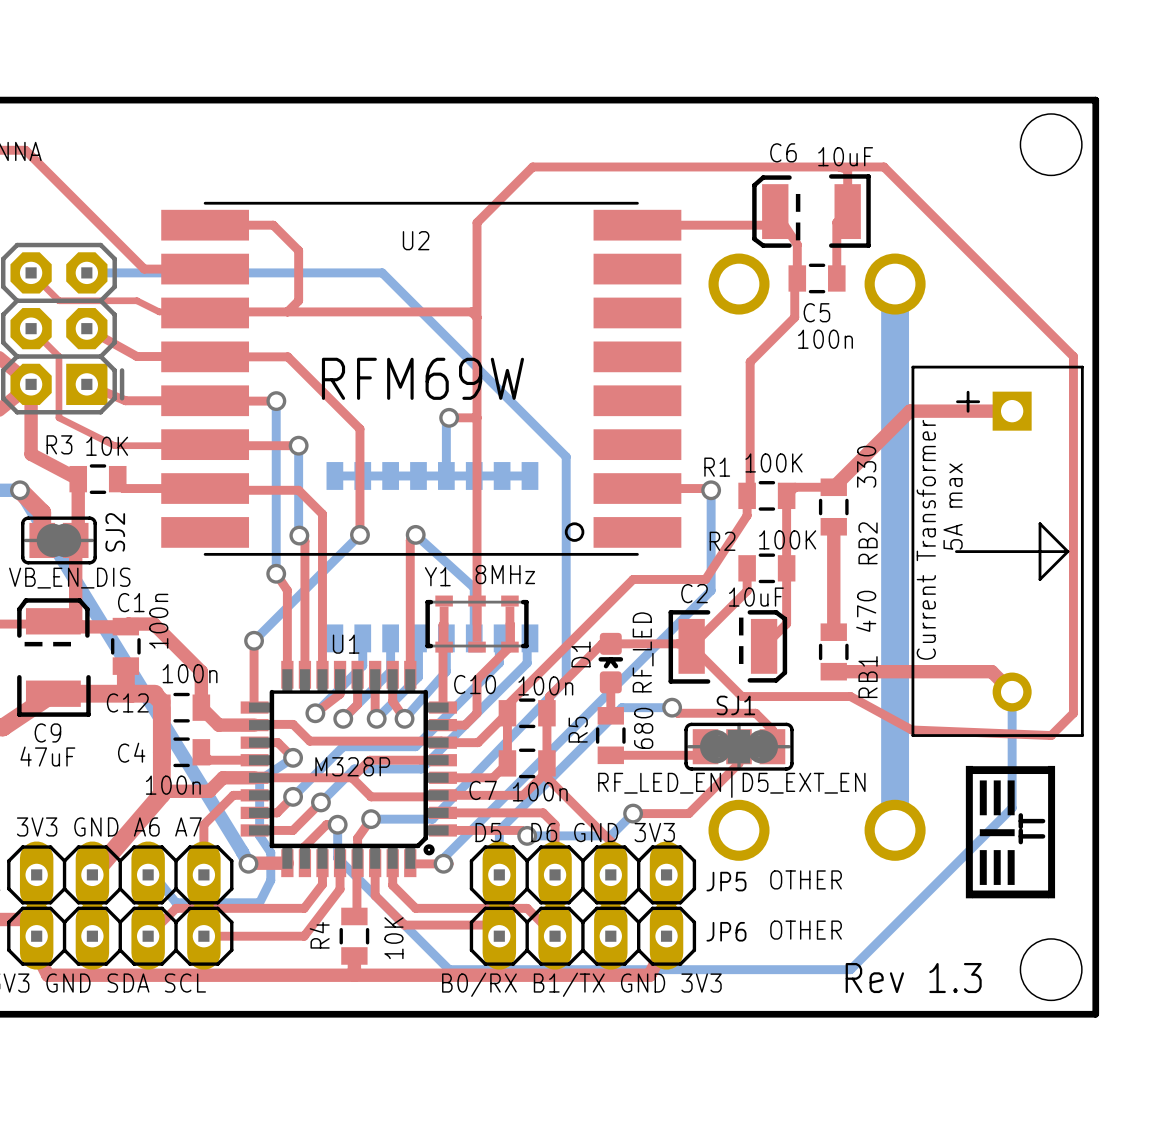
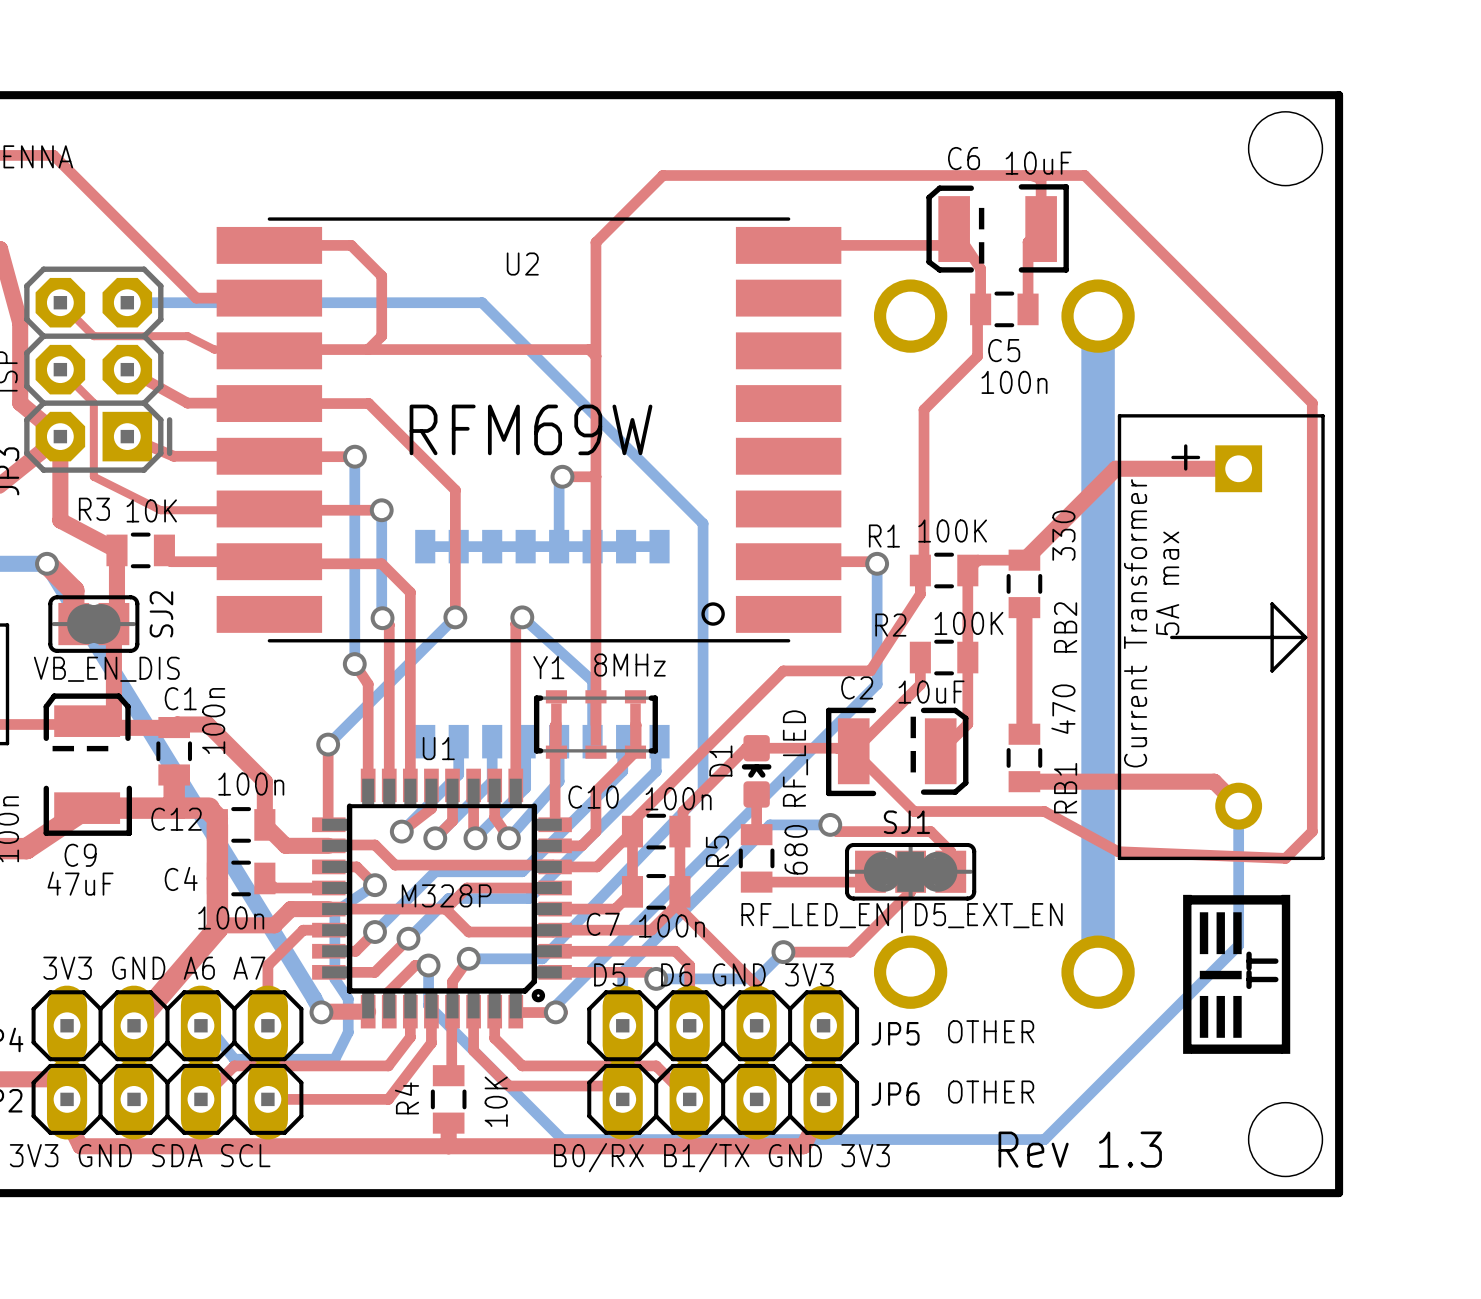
text position: Rev 1.3 (913, 978) -> Rev 1.3 (1080, 1149)

